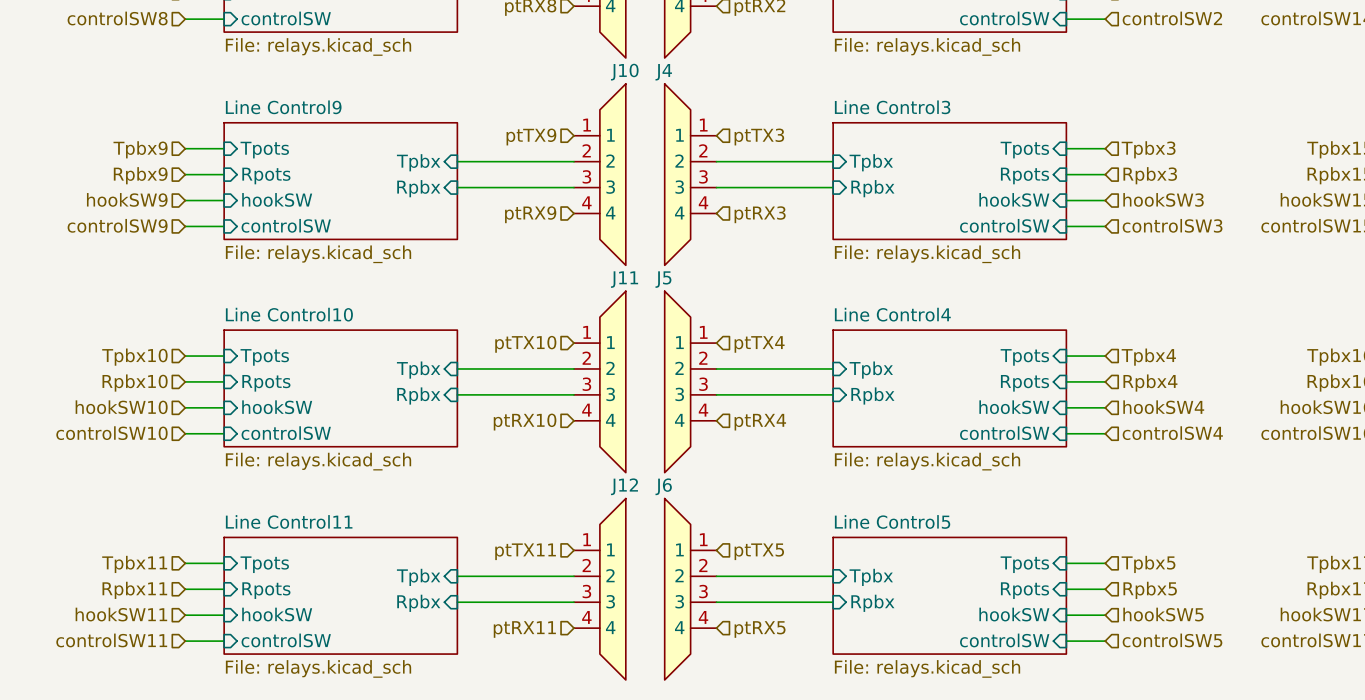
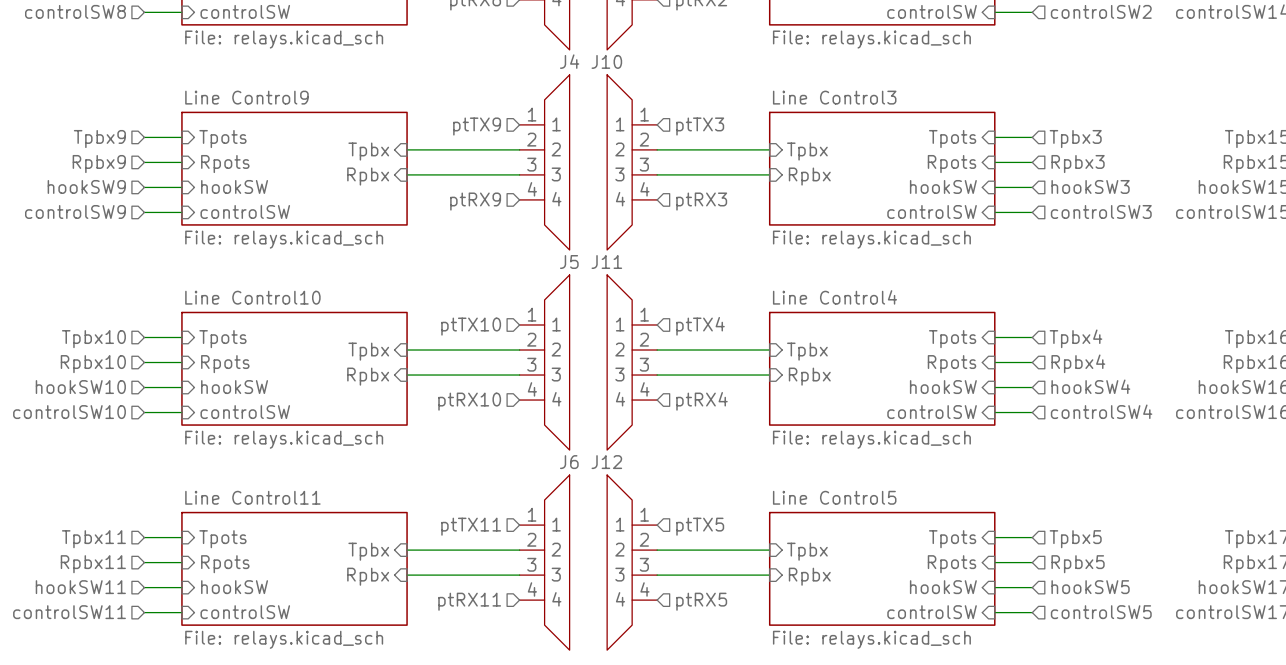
J10 name: J10 (624, 72) -> J4 (569, 61)
J4 name: J4 (663, 72) -> J10 (606, 61)
J11 name: J11 (624, 279) -> J5 (569, 262)
J5 name: J5 (663, 279) -> J11 (606, 262)
J12 name: J12 (624, 486) -> J6 (569, 462)
J6 name: J6 (663, 486) -> J12 (606, 462)

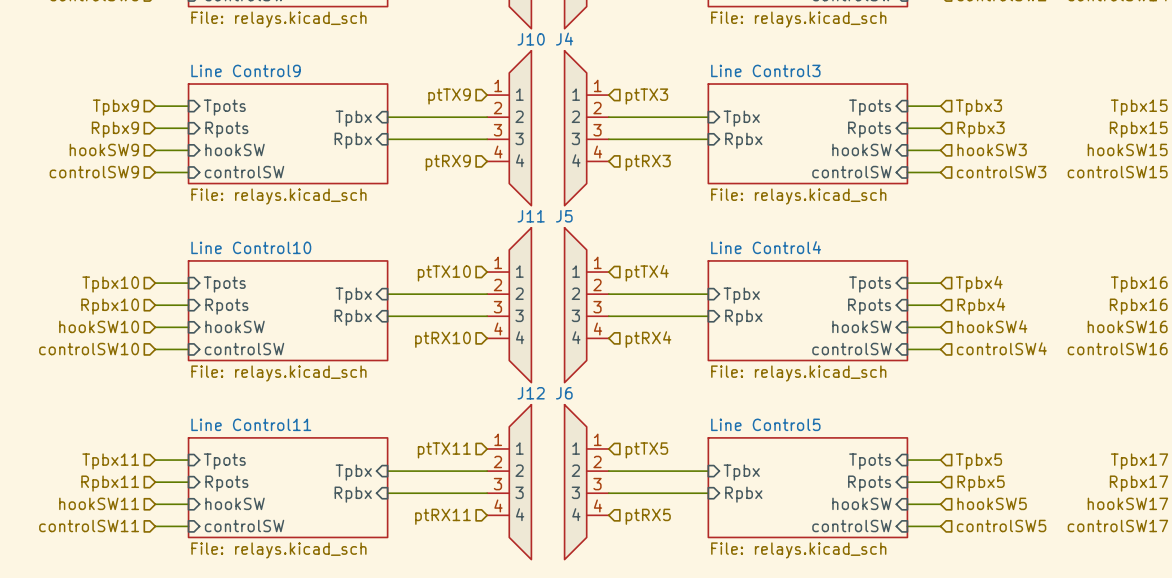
J4 name: J4 (569, 61) -> J10 (531, 39)
J10 name: J10 (606, 61) -> J4 (564, 39)
J5 name: J5 (569, 262) -> J11 (531, 216)
J11 name: J11 (606, 262) -> J5 (564, 216)
J6 name: J6 (569, 462) -> J12 (531, 393)
J12 name: J12 (606, 462) -> J6 (564, 393)

